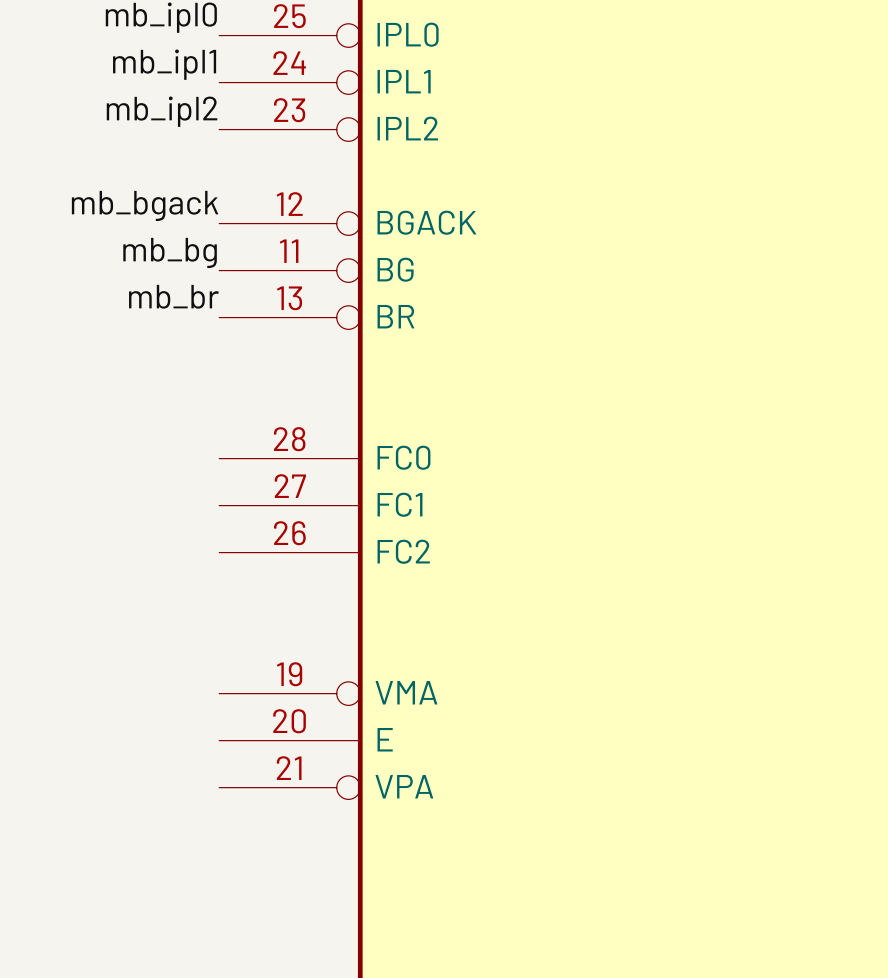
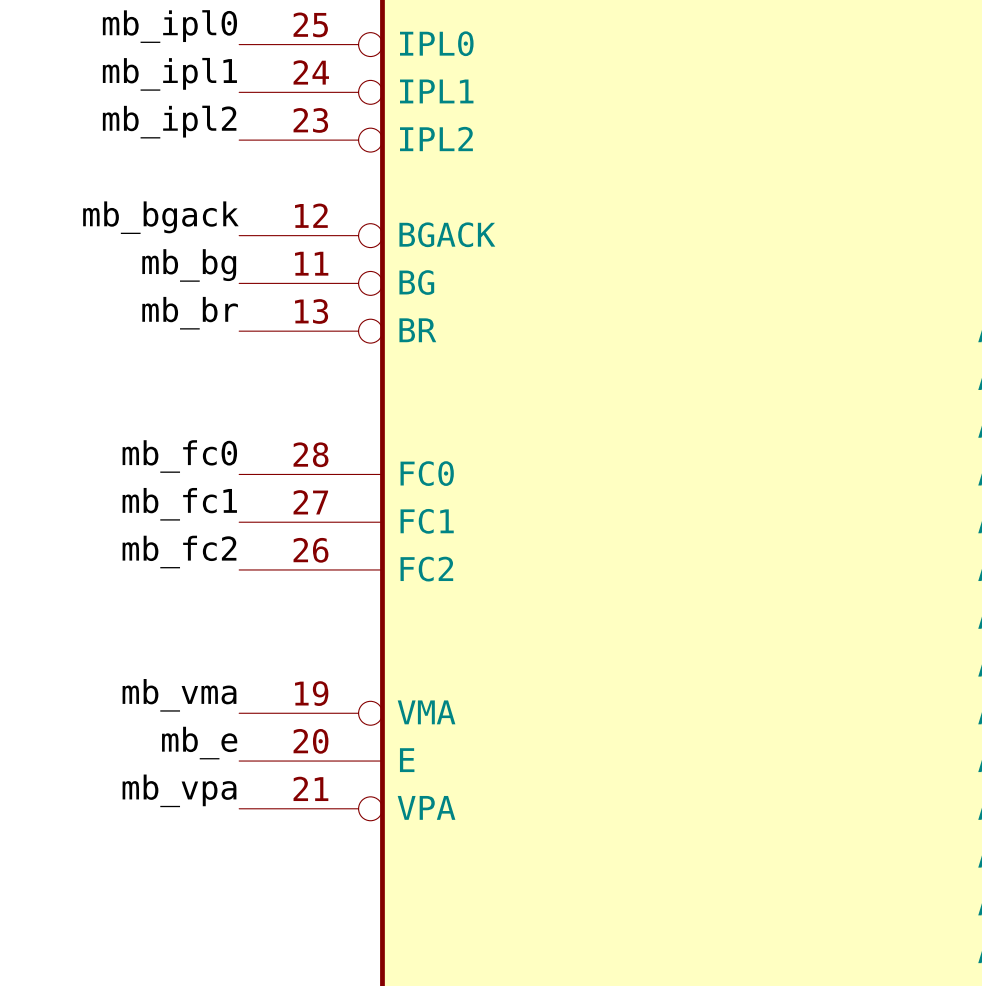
label: none -> mb_fc0 (179, 456)
label: none -> mb_fc1 (179, 504)
label: none -> mb_fc2 (179, 552)
label: none -> mb_vma (179, 695)
label: none -> mb_e (199, 743)
label: none -> mb_vpa (179, 790)

